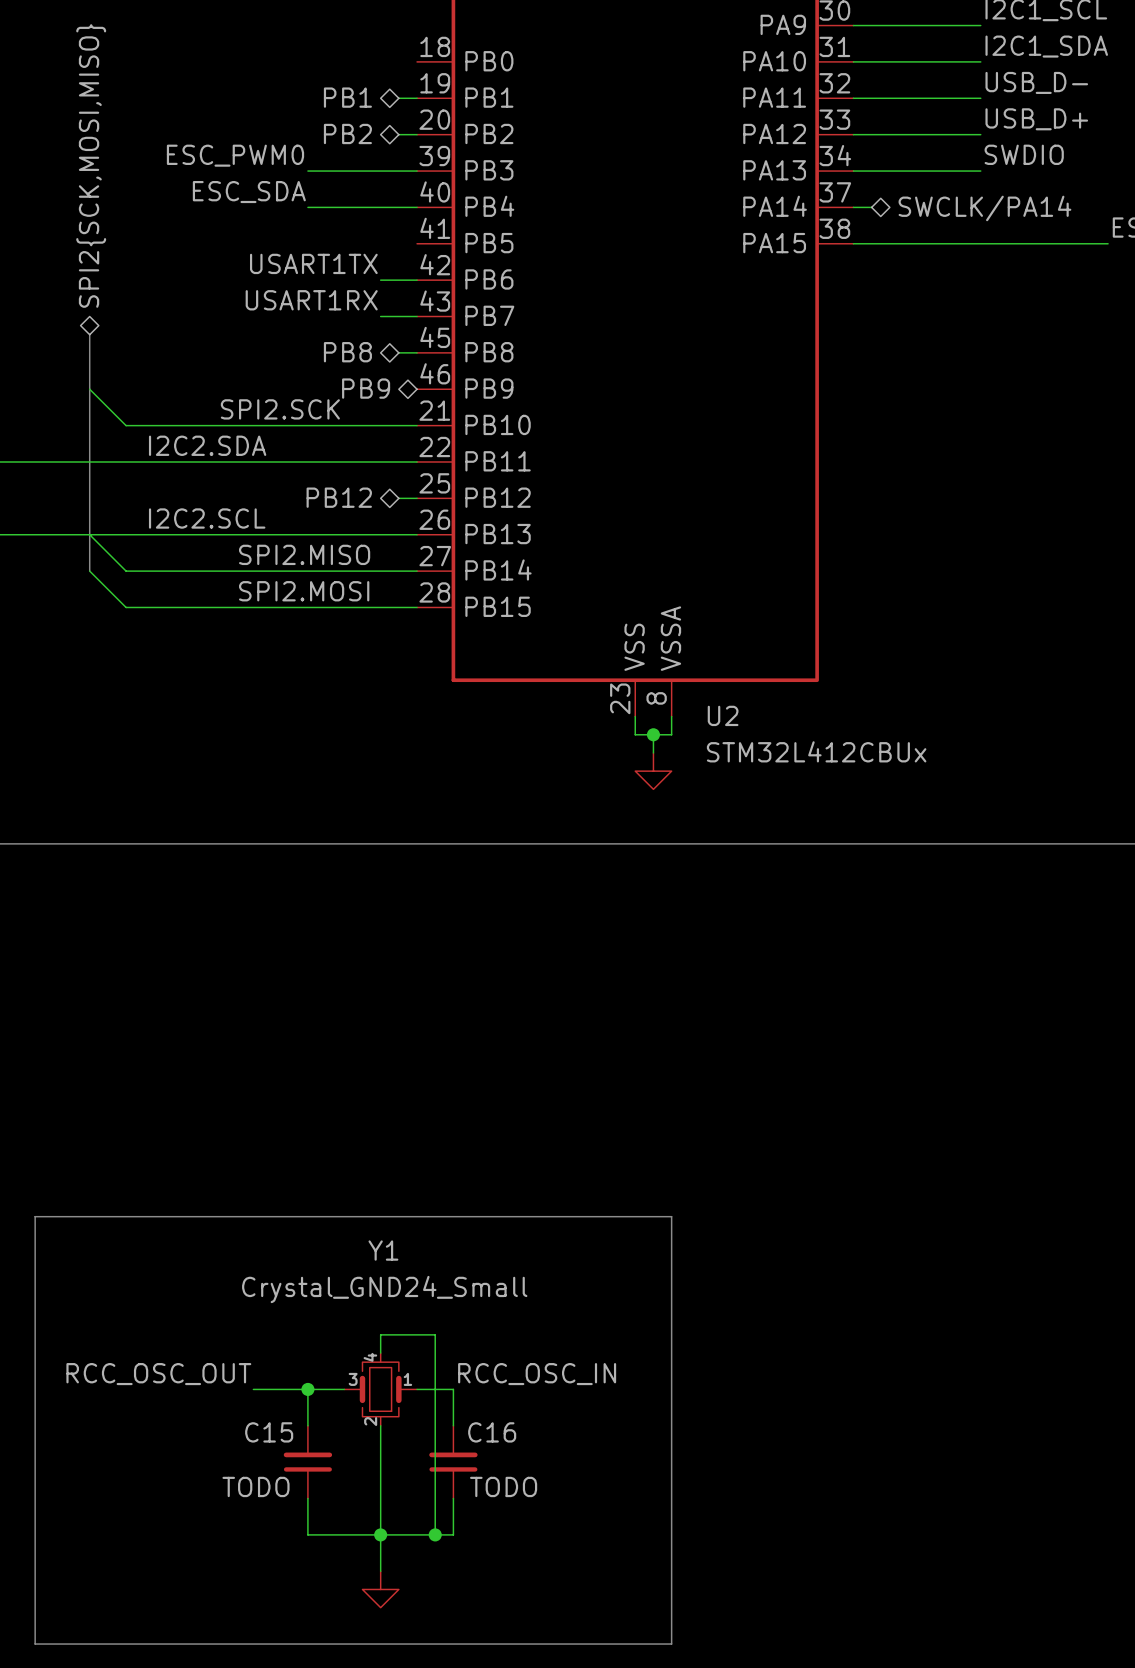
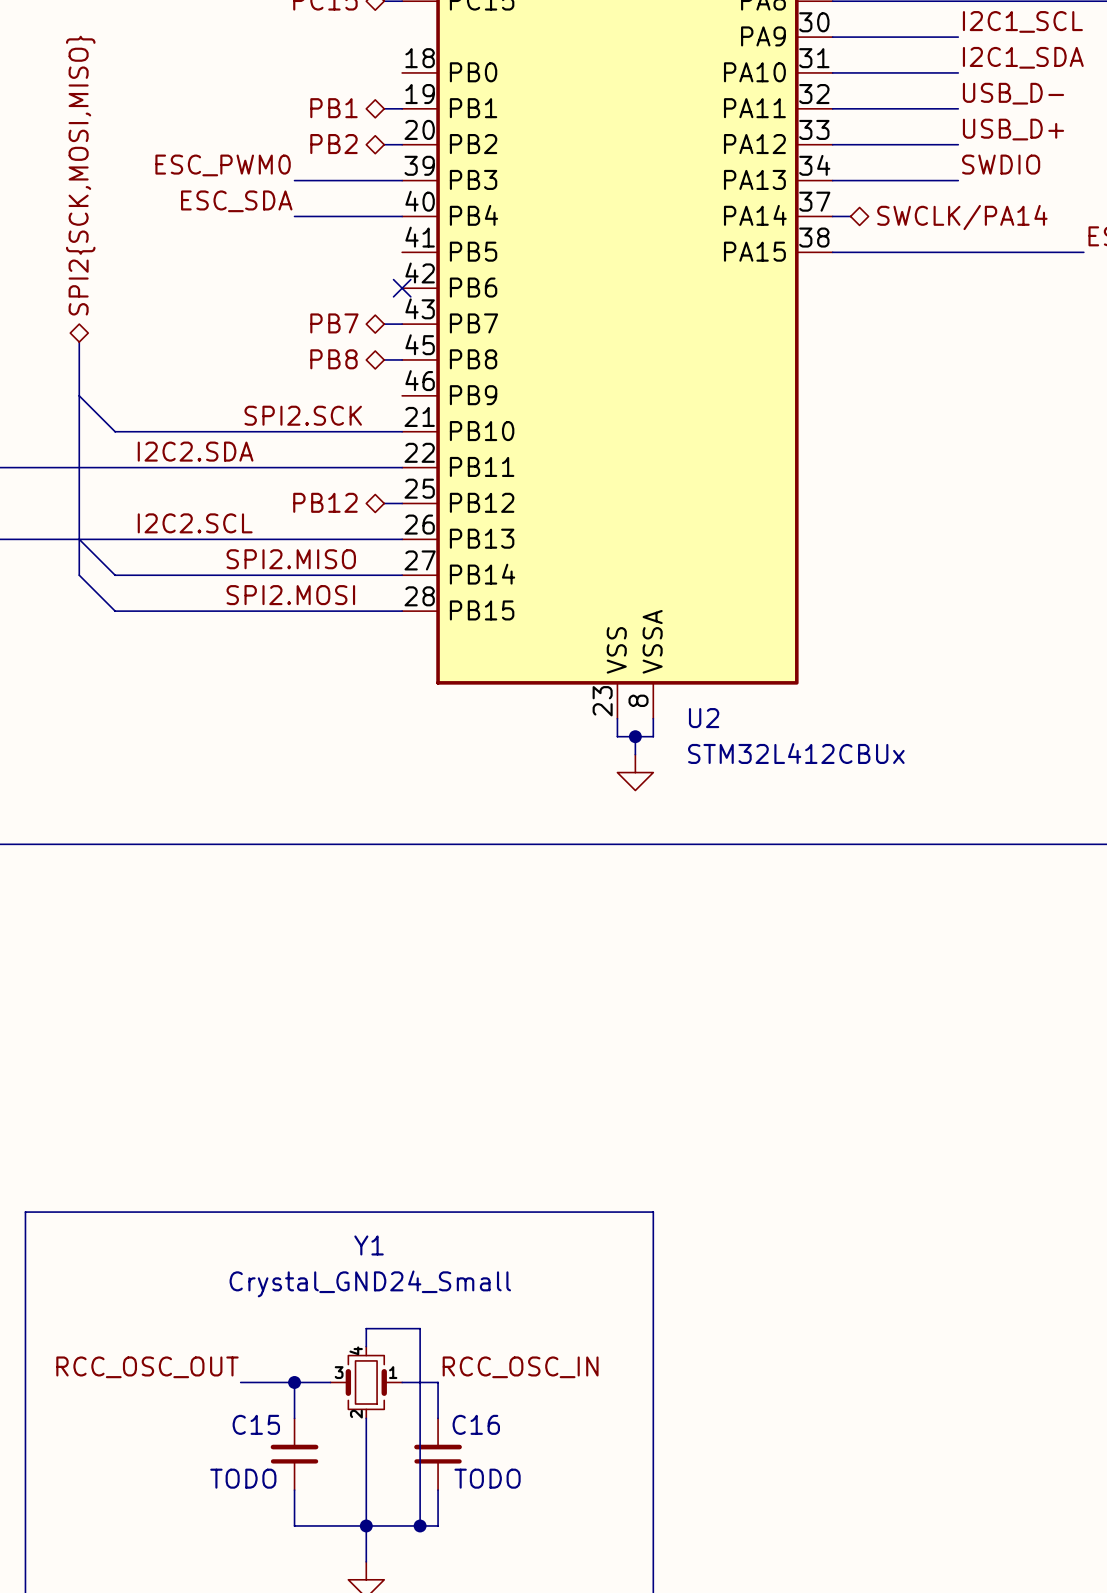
label: USART1TX (313, 263) -> none
wire: (380, 280) (417, 280) -> none
no-connect mark: none -> (402, 288)
label: USART1RX (311, 300) -> none
hierarchical label: none -> PB7 (334, 323)
wire: (380, 316) (398, 316) -> none
hierarchical label: PB9 (366, 388) -> none
label position: SPI2.SCK (280, 409) -> SPI2.SCK (303, 415)

